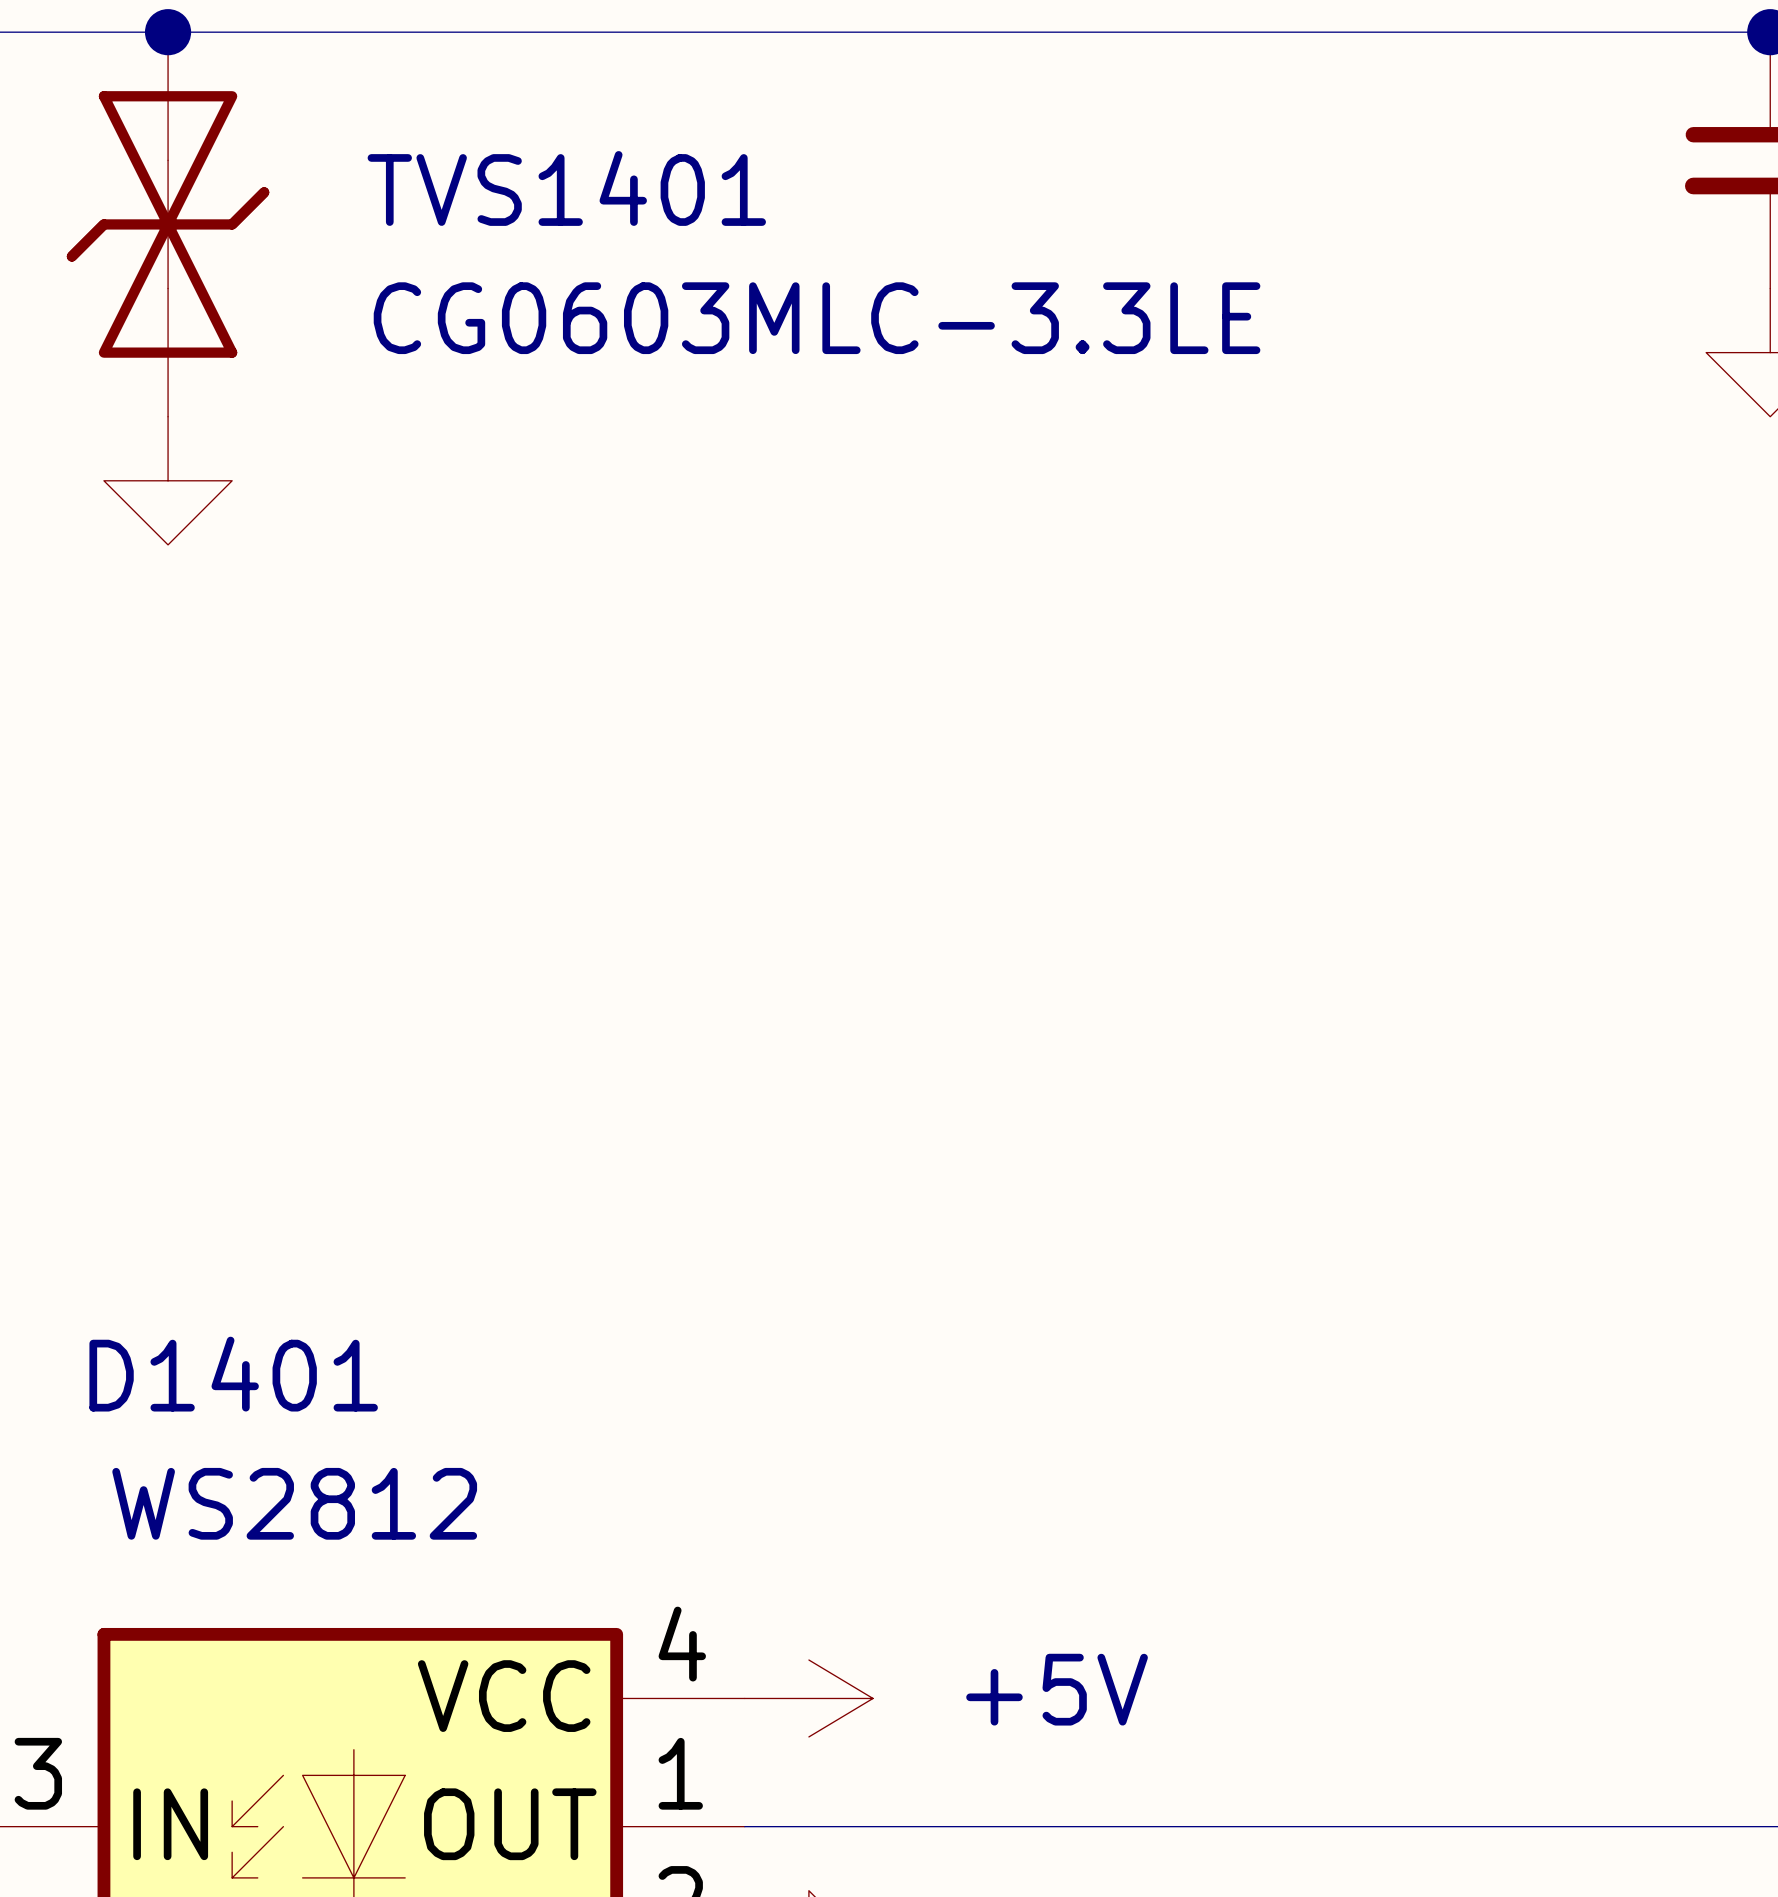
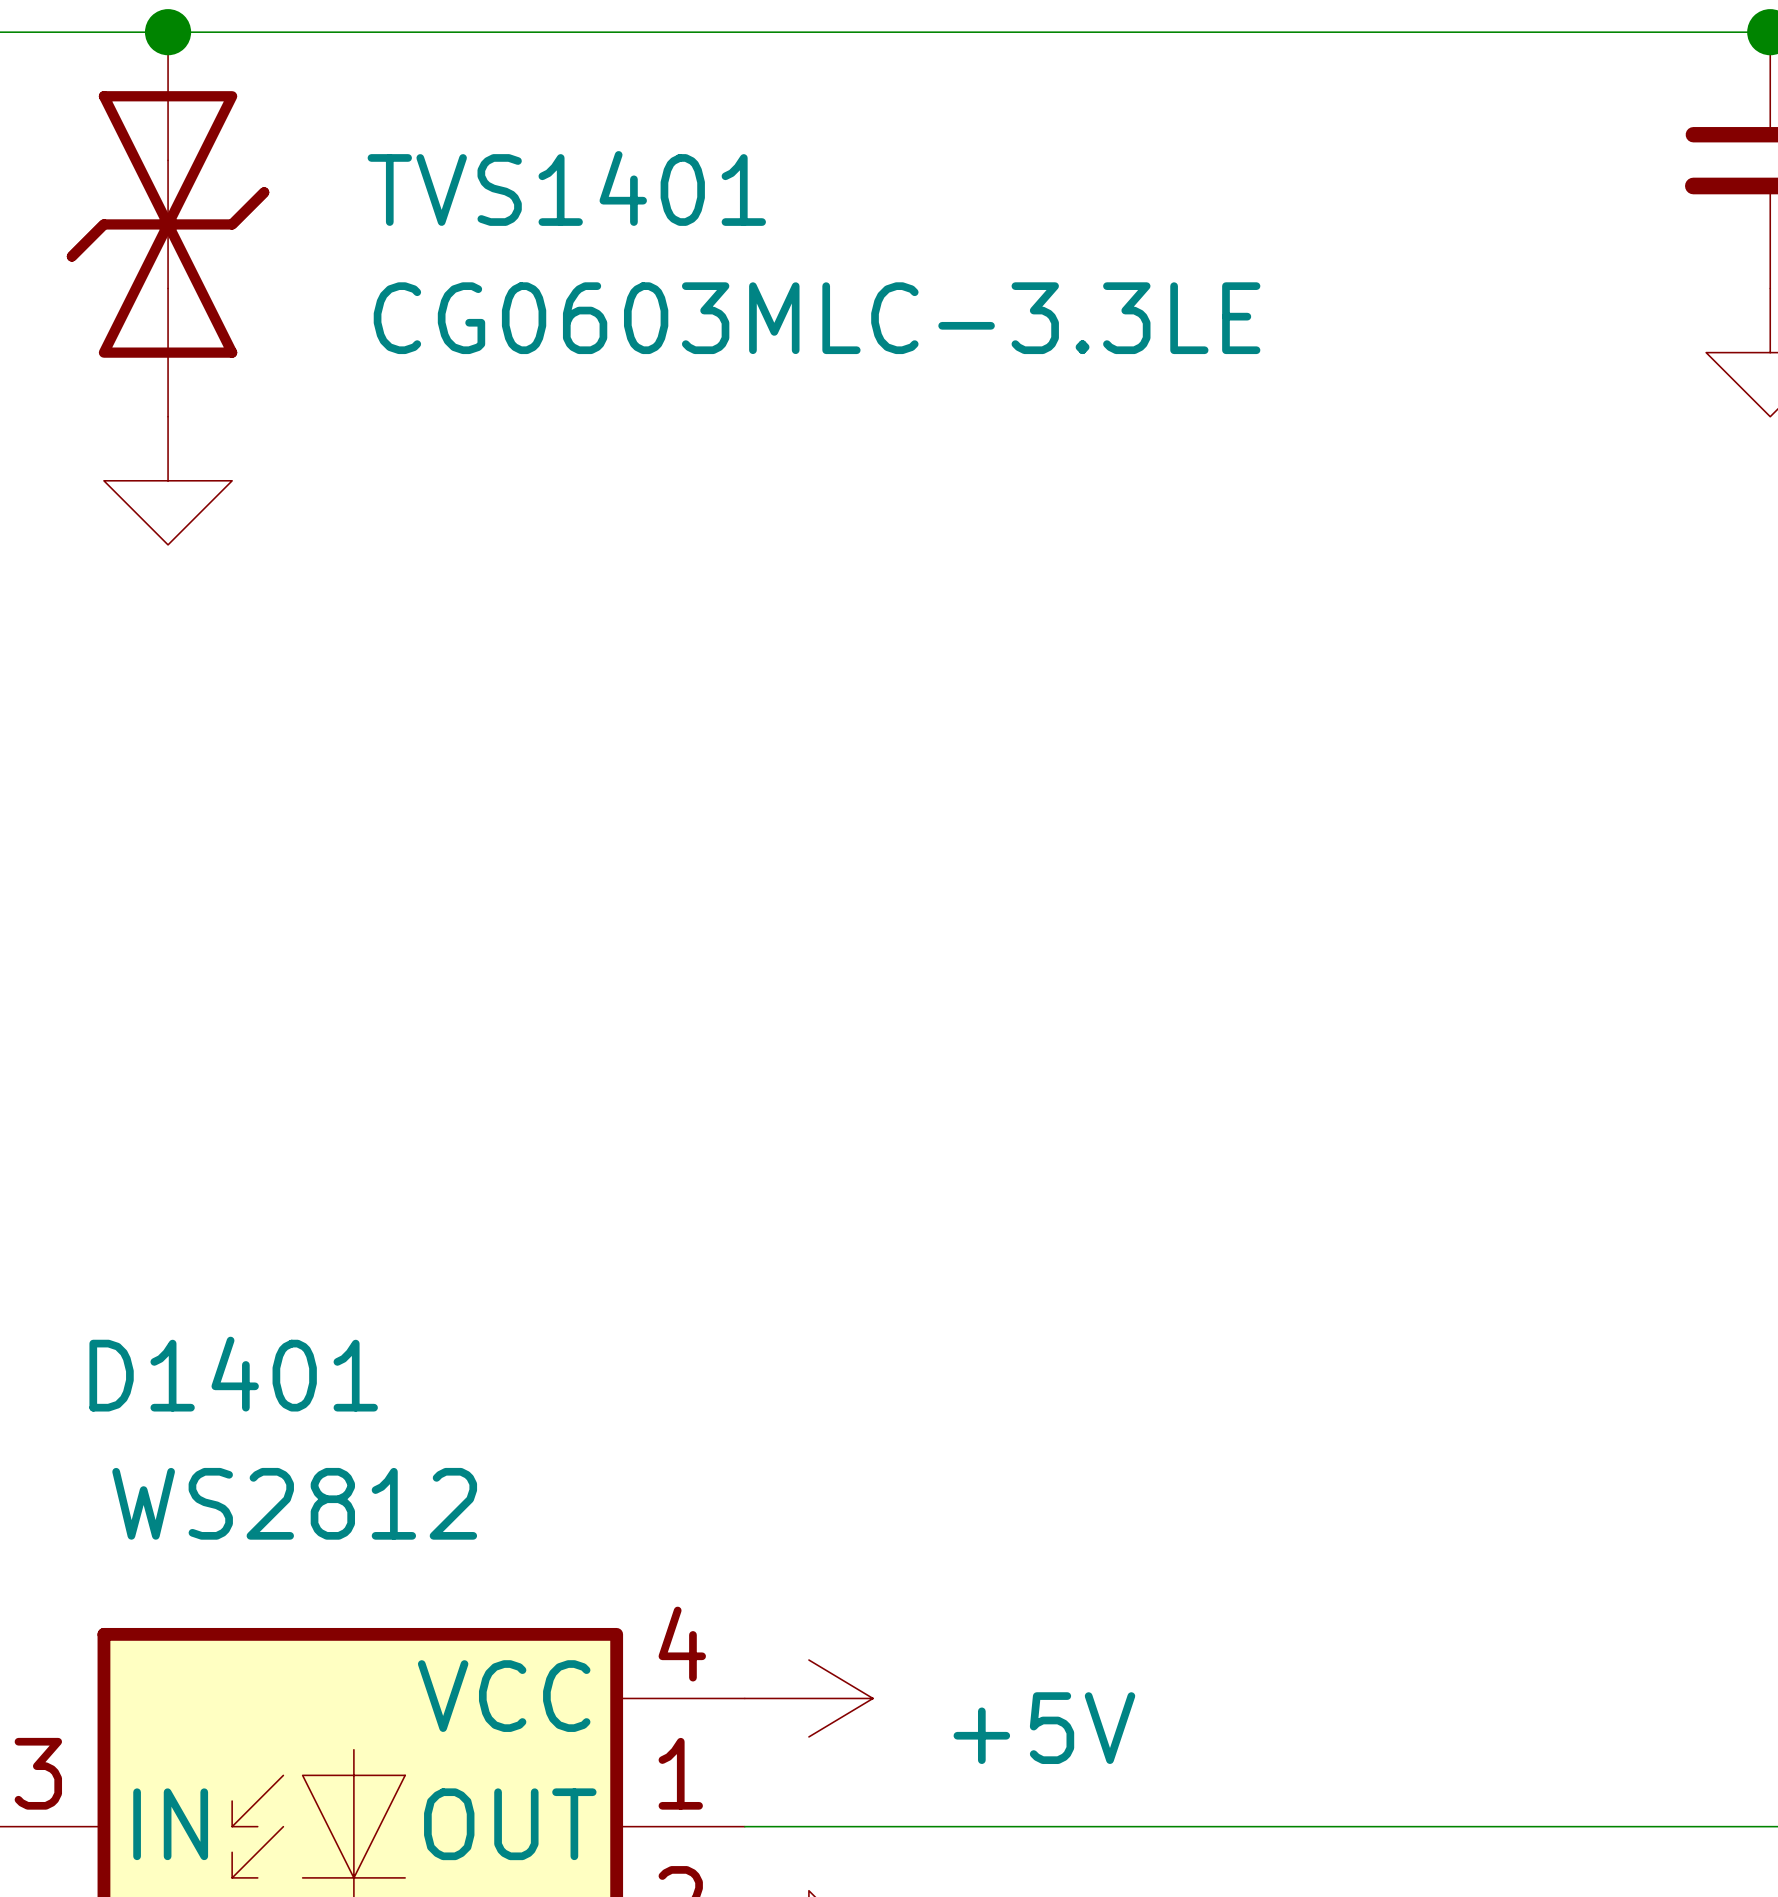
power symbol text position: +5V (1057, 1689) -> +5V (1044, 1728)

